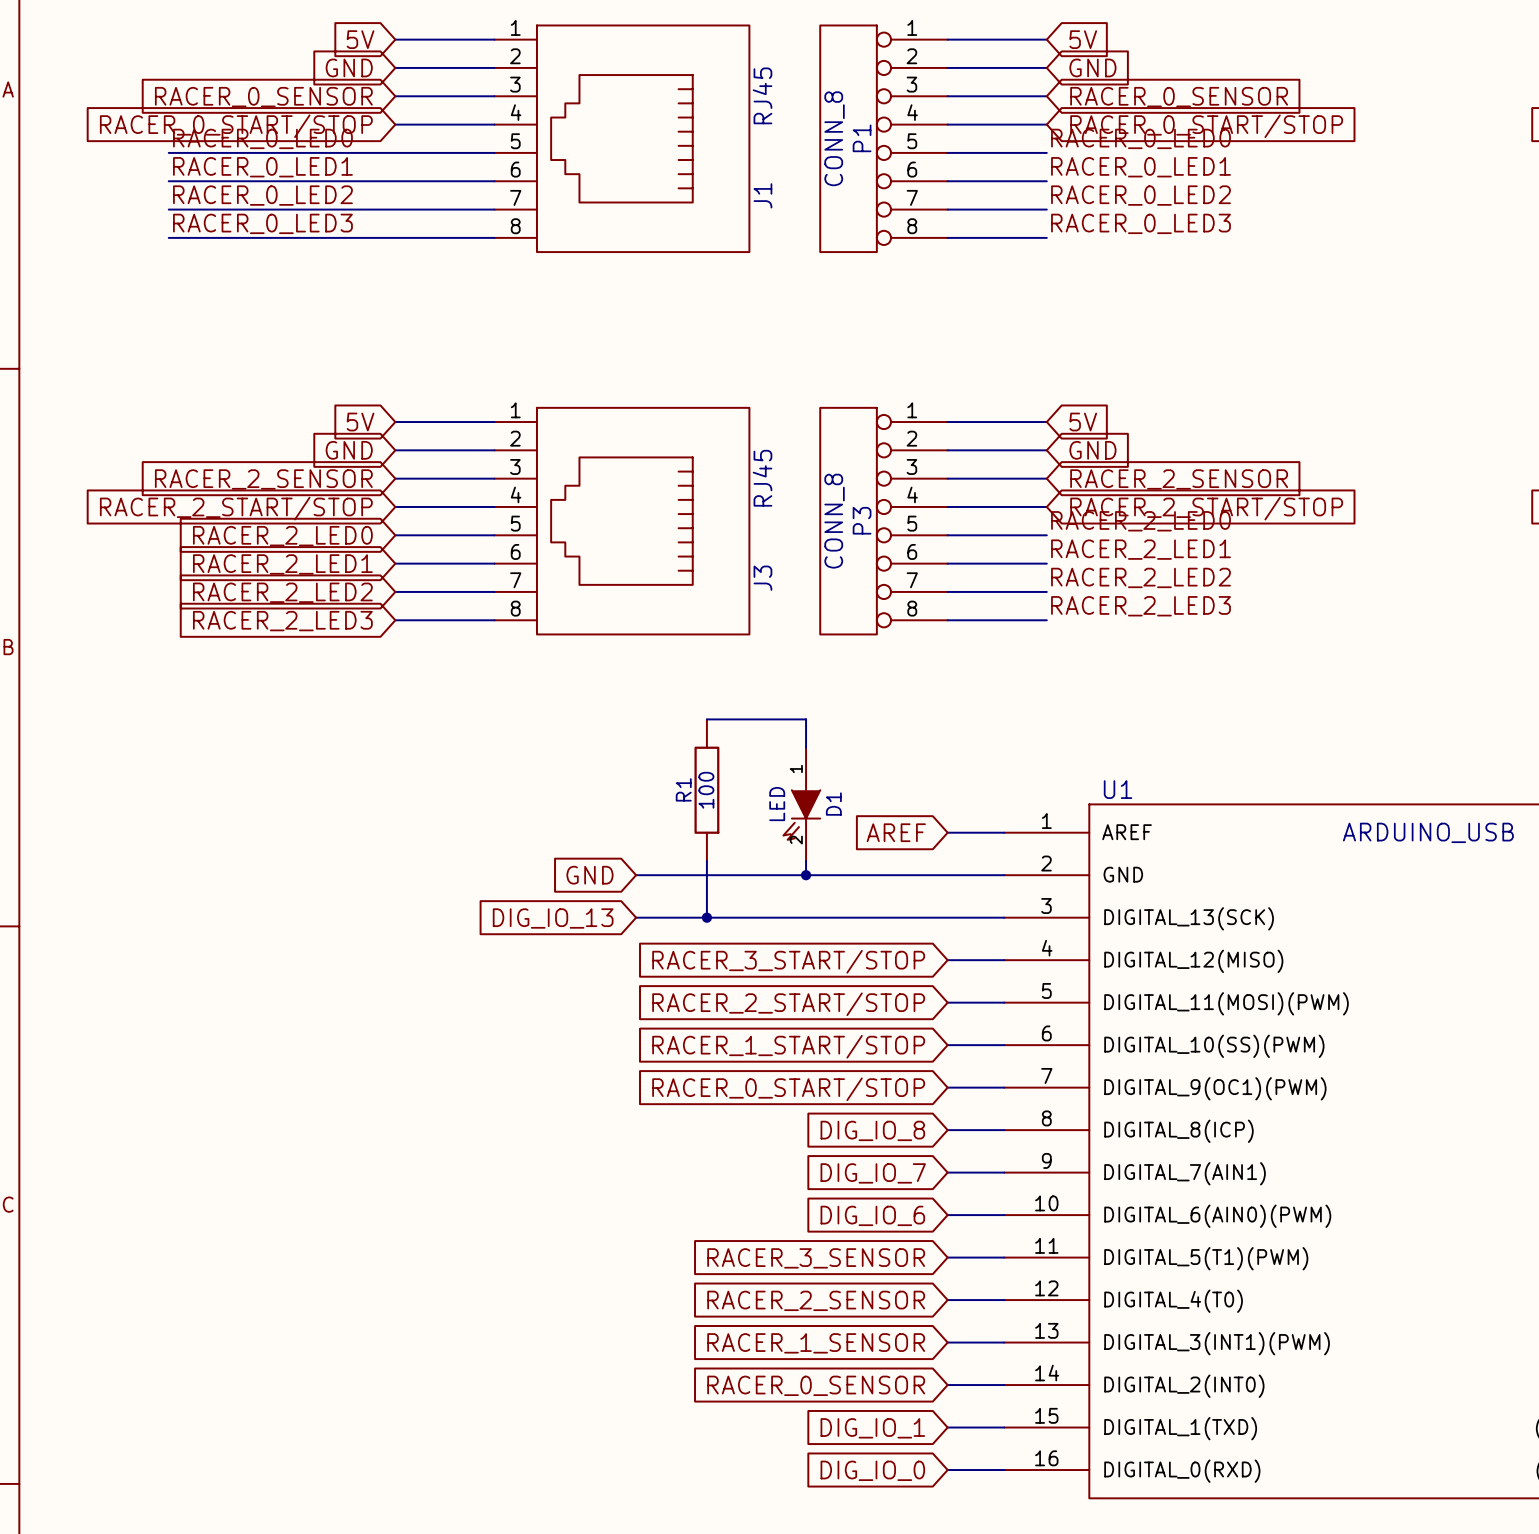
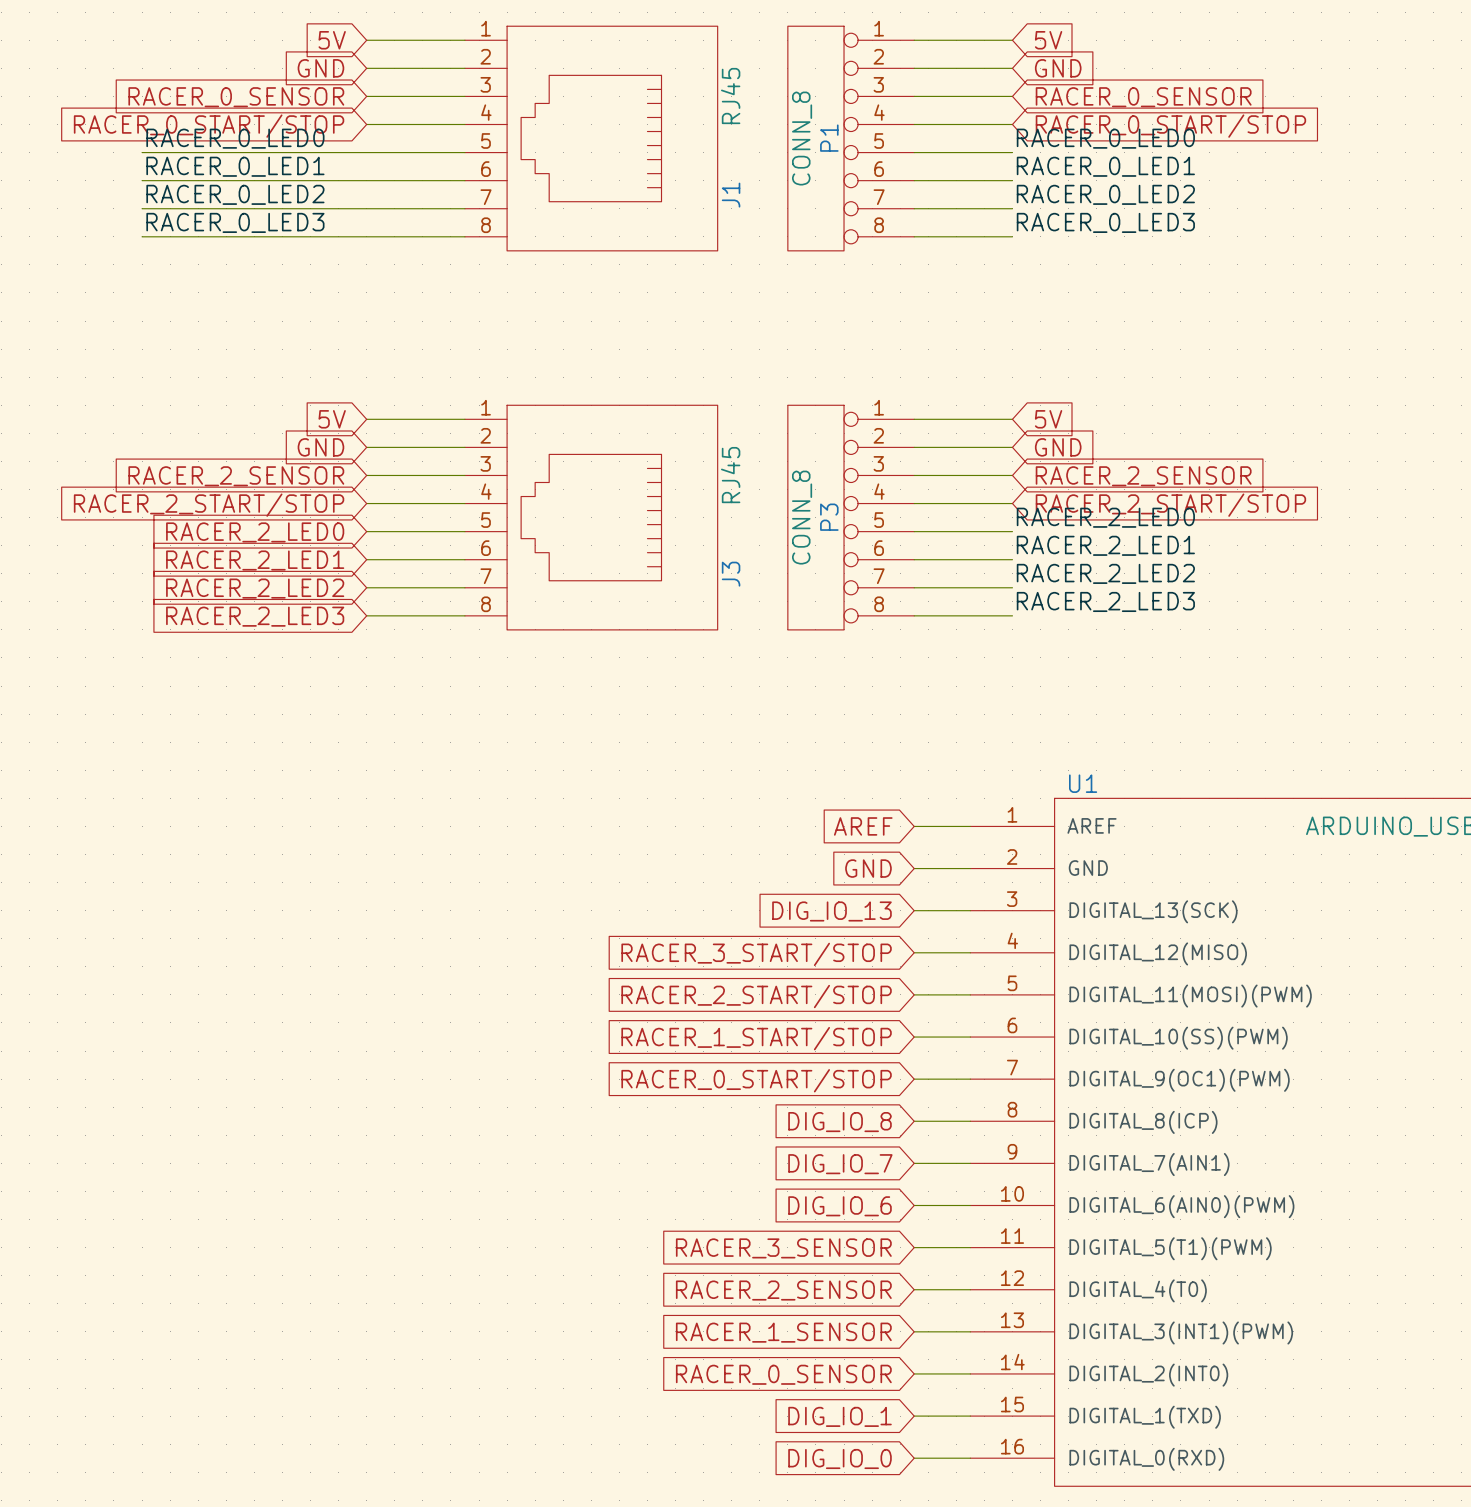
wire: (706, 719) (806, 719) (806, 747) -> none
R1: 100 (706, 790) -> none
D1: LED (801, 804) -> none
wire: (706, 861) (706, 917) -> none
wire: (806, 861) (806, 875) -> none
global label: GND (589, 875) -> none
wire: (636, 875) (947, 875) -> none
junction: (806, 875) -> none
global label: none -> GND (868, 868)
wire: (636, 917) (947, 917) -> none
junction: (706, 917) -> none
global label: DIG_IO_13 (553, 918) -> none
global label: none -> DIG_IO_13 (831, 911)

